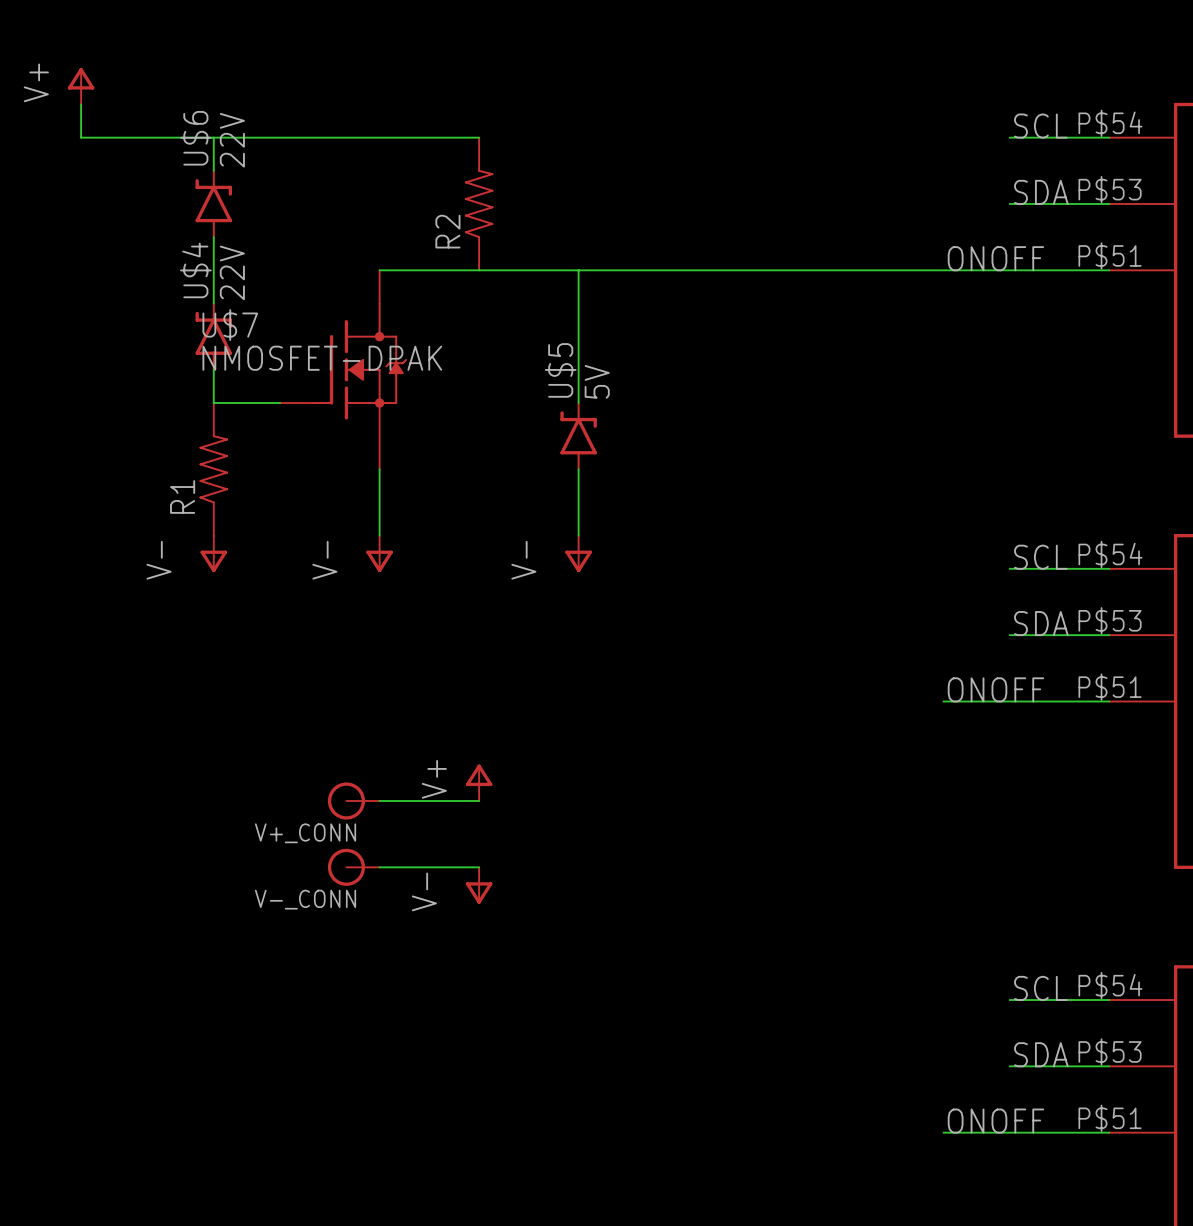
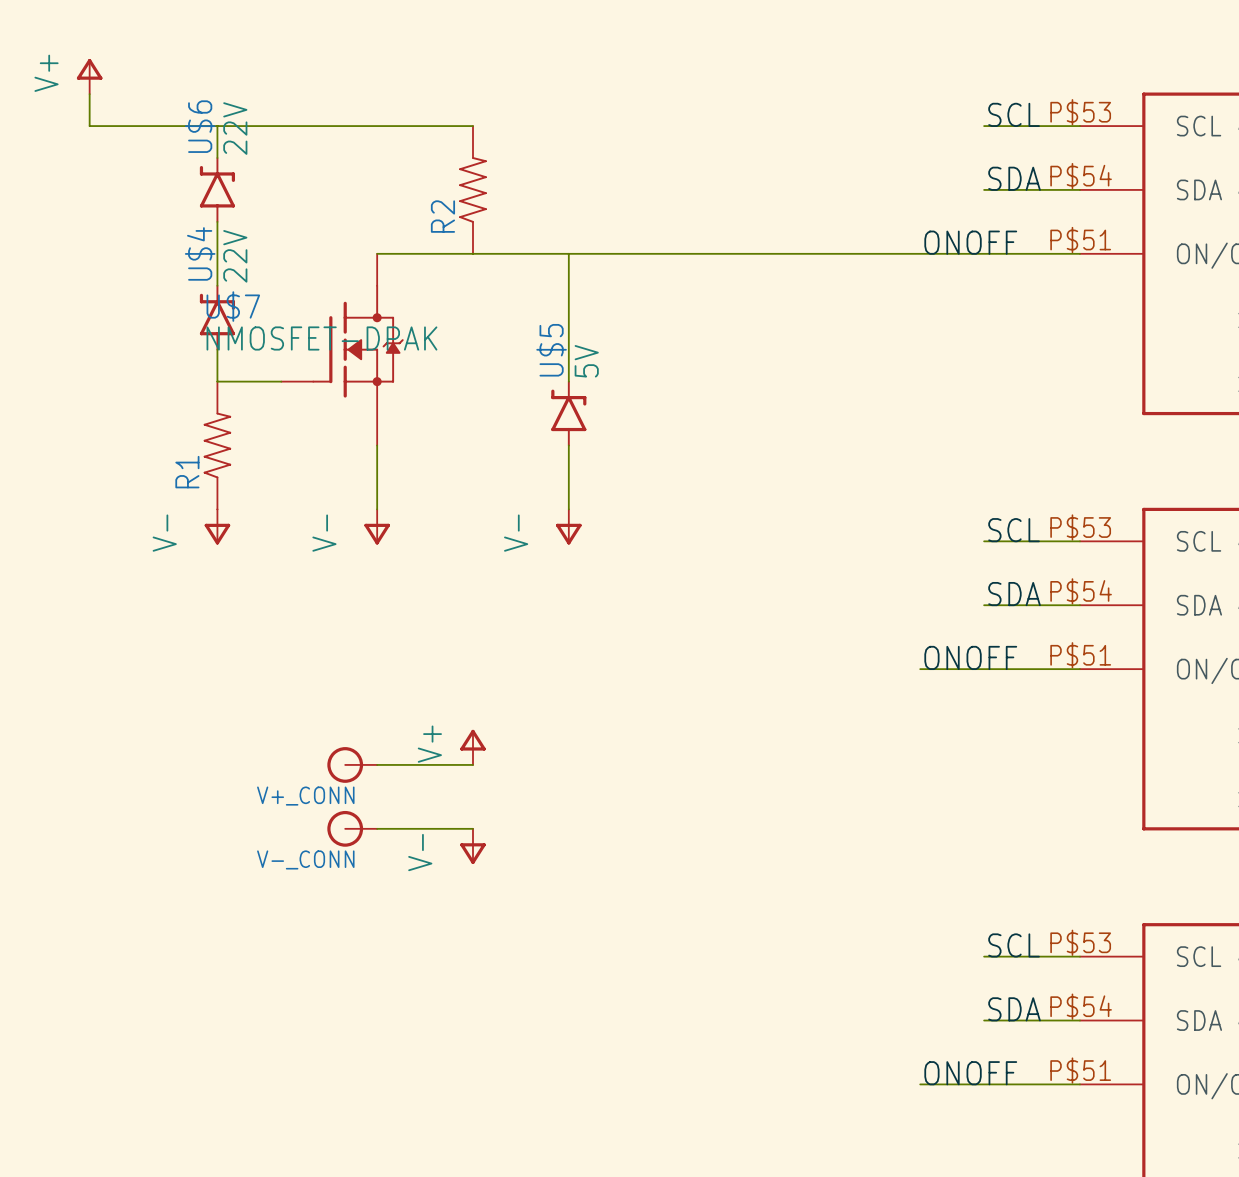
part pin number: P$54 (1110, 123) -> P$53 (1080, 112)
part pin number: P$53 (1110, 189) -> P$54 (1081, 176)
part pin number: P$54 (1110, 554) -> P$53 (1080, 527)
part pin number: P$53 (1110, 620) -> P$54 (1081, 591)
part pin number: P$54 (1110, 985) -> P$53 (1080, 942)
part pin number: P$53 (1110, 1051) -> P$54 (1081, 1006)

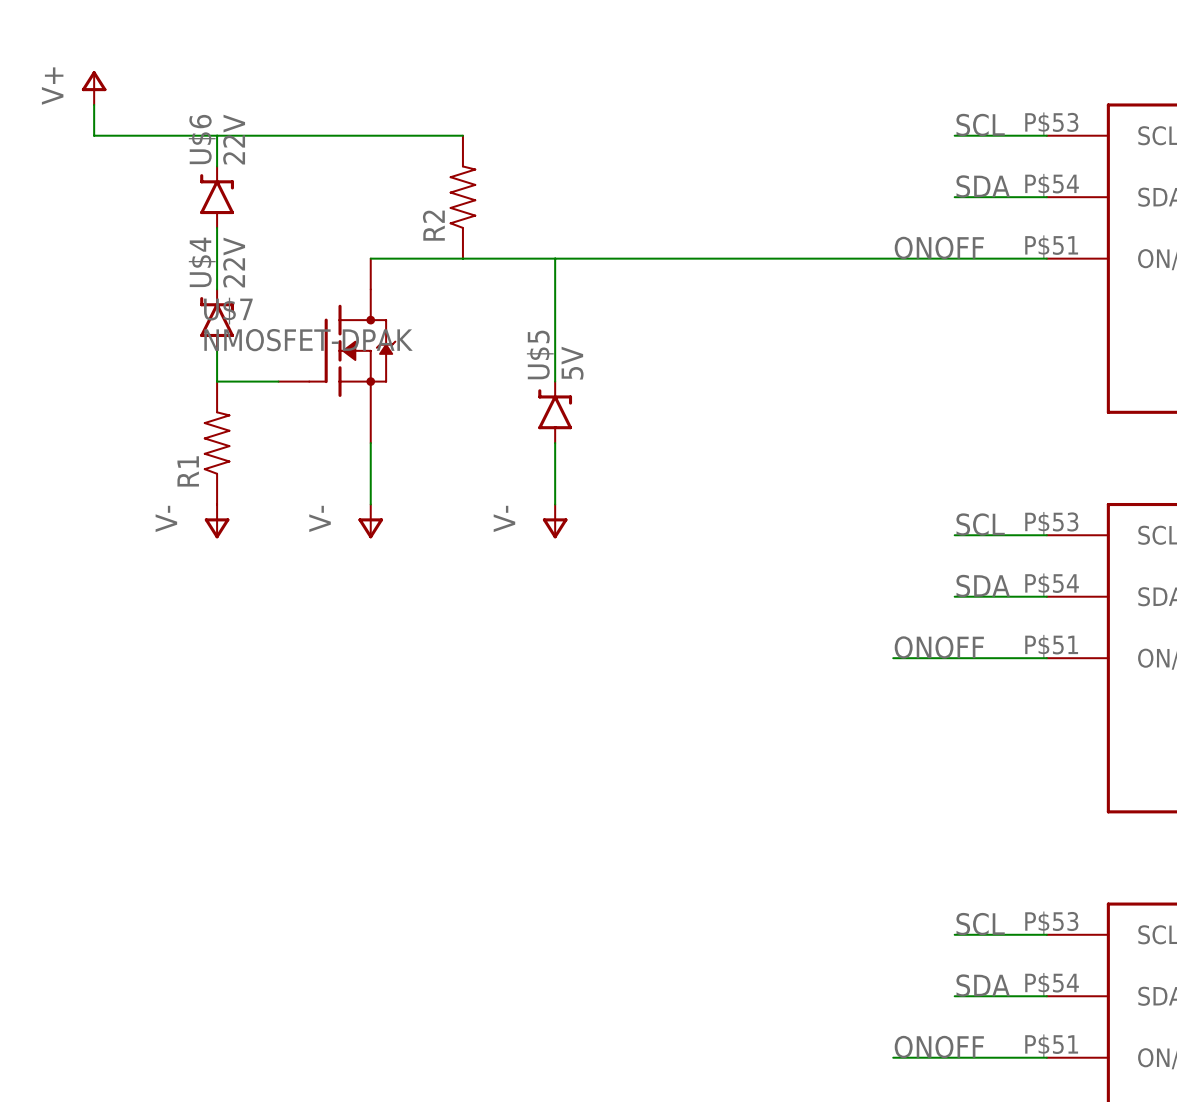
power symbol: V+ (472, 747) -> none
V+_CONN: (352, 764) -> none
wire: (377, 764) (472, 764) -> none
V-_CONN: (352, 828) -> none
wire: (377, 828) (472, 828) -> none
power symbol: V- (472, 846) -> none

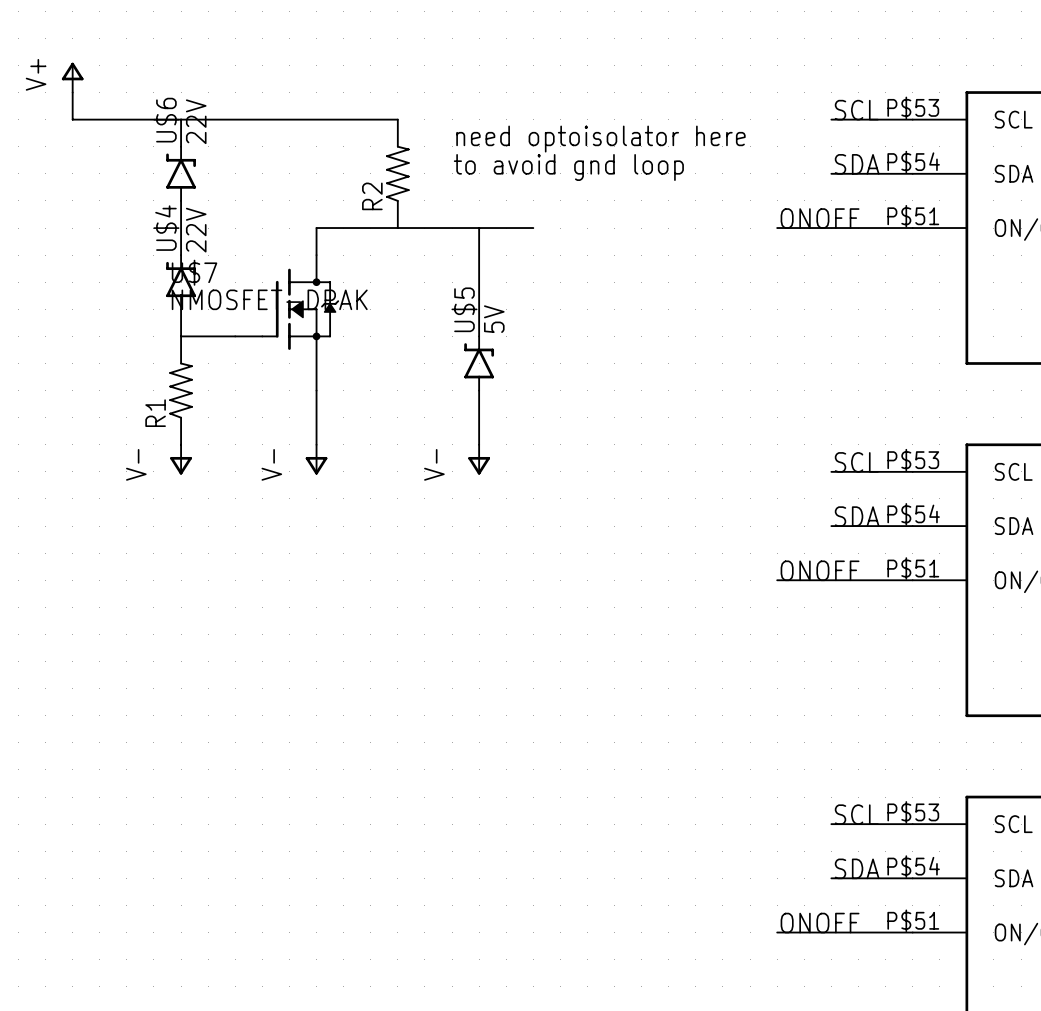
text: none -> need optoisolator here (600, 139)
text: none -> to avoid gnd loop (568, 167)
wire: (616, 258) (893, 258) -> none

